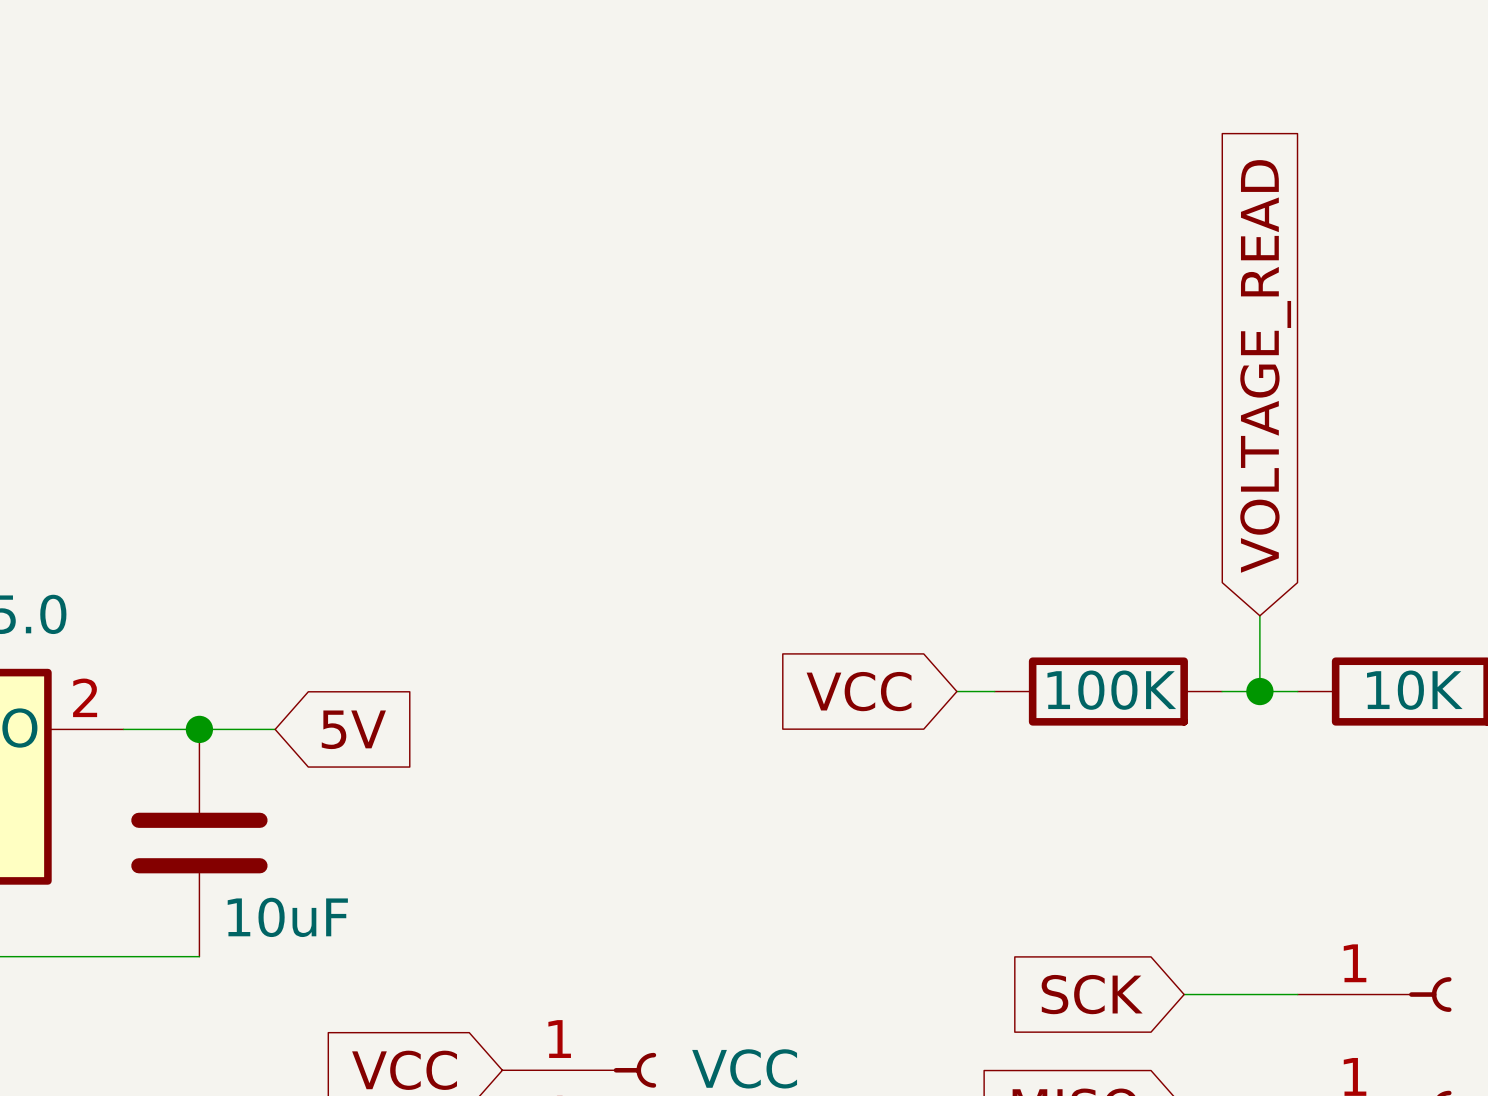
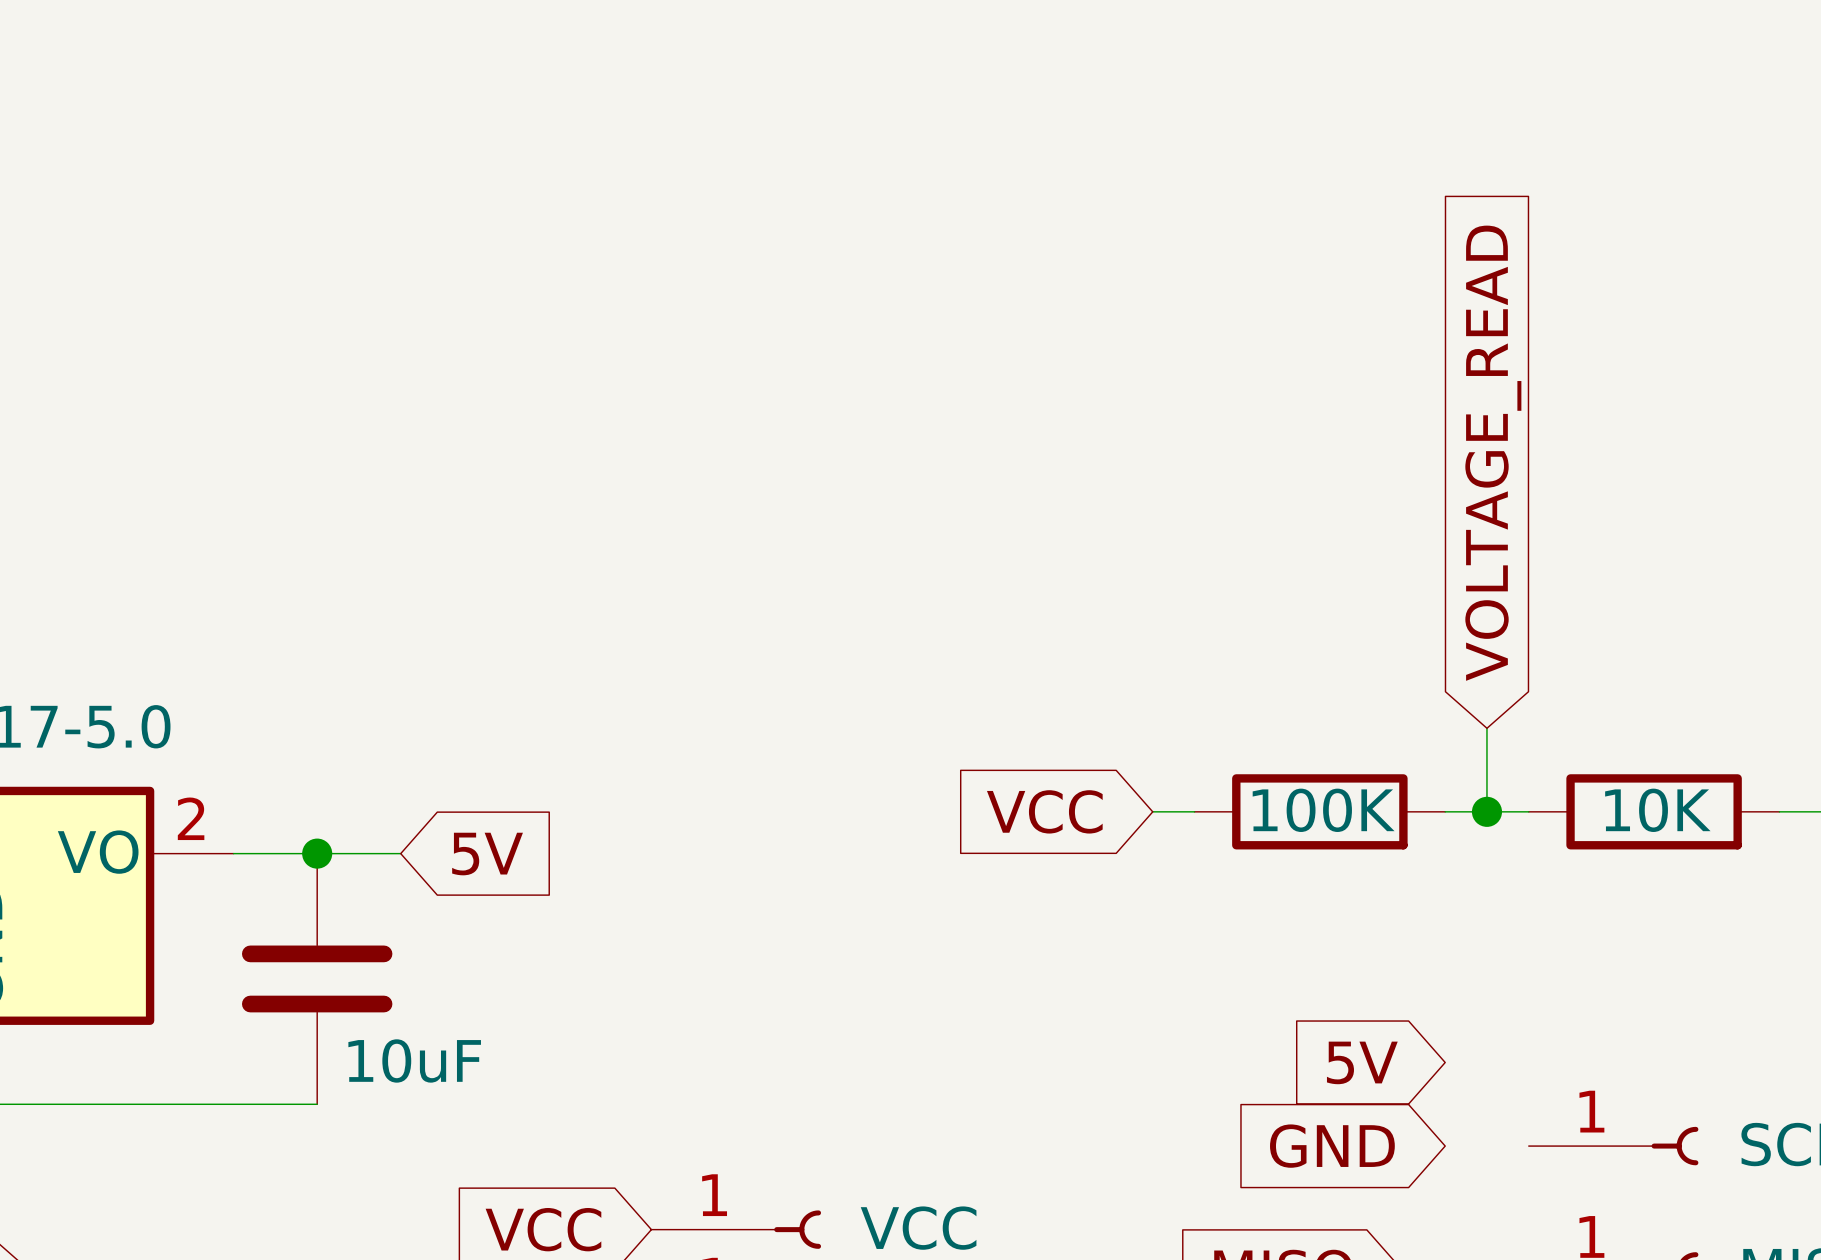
global label: none -> 5V (1362, 1062)
global label: SCK (1092, 994) -> none
global label: none -> GND (1332, 1146)
wire: (1184, 994) (1297, 994) -> none

